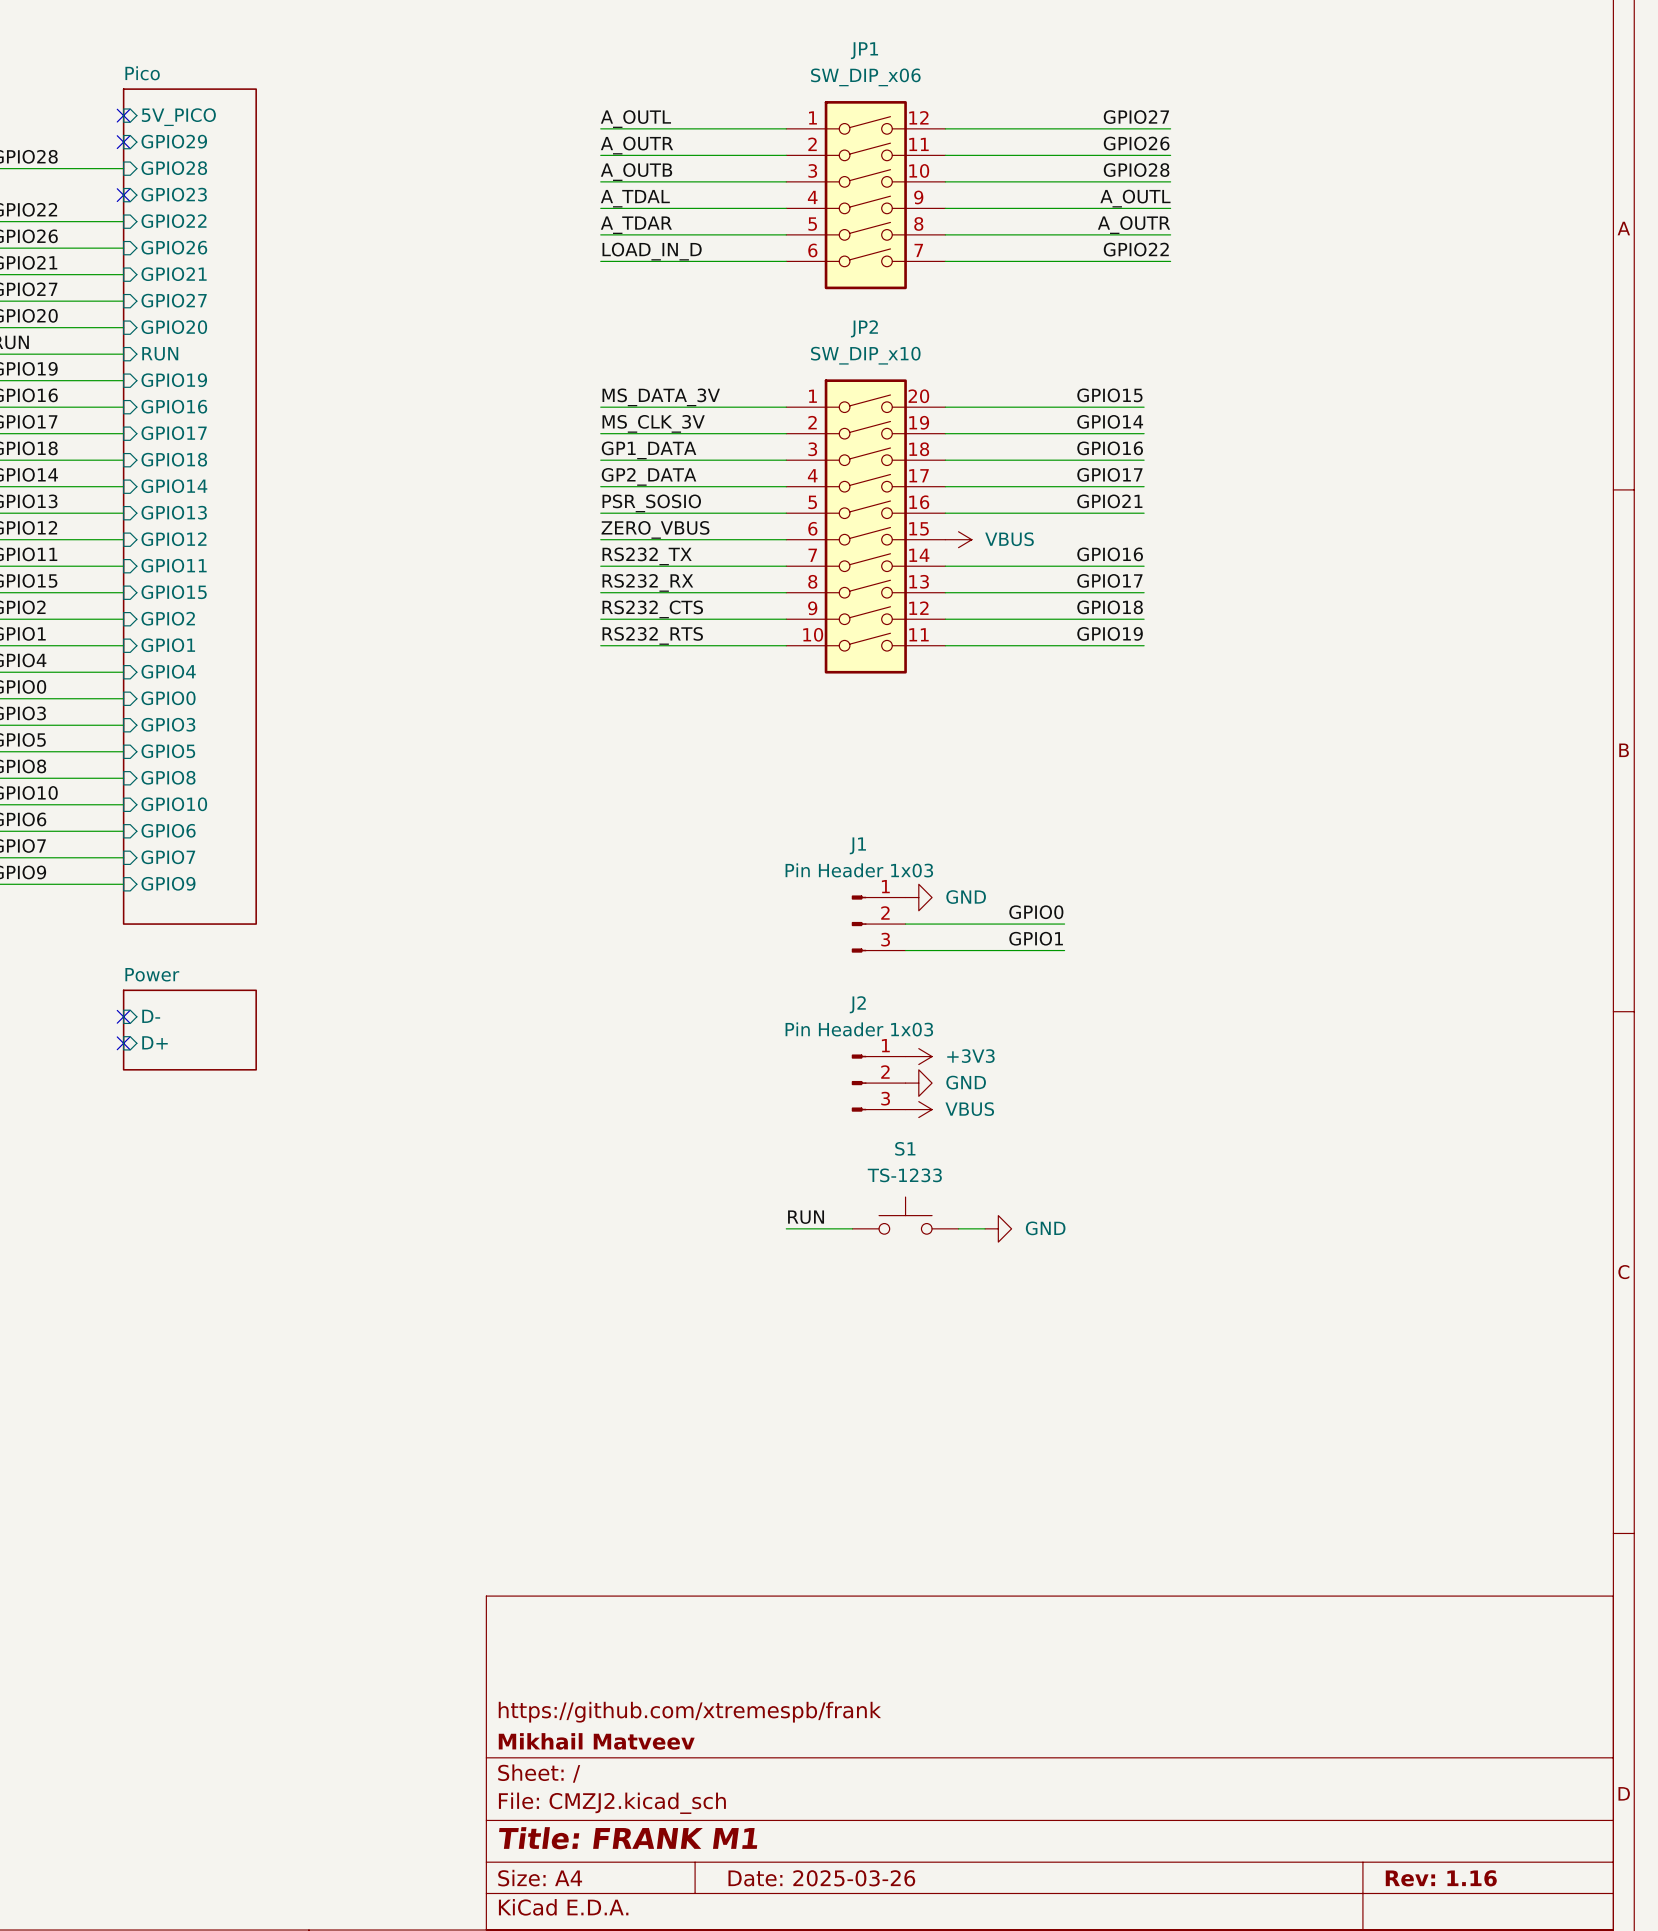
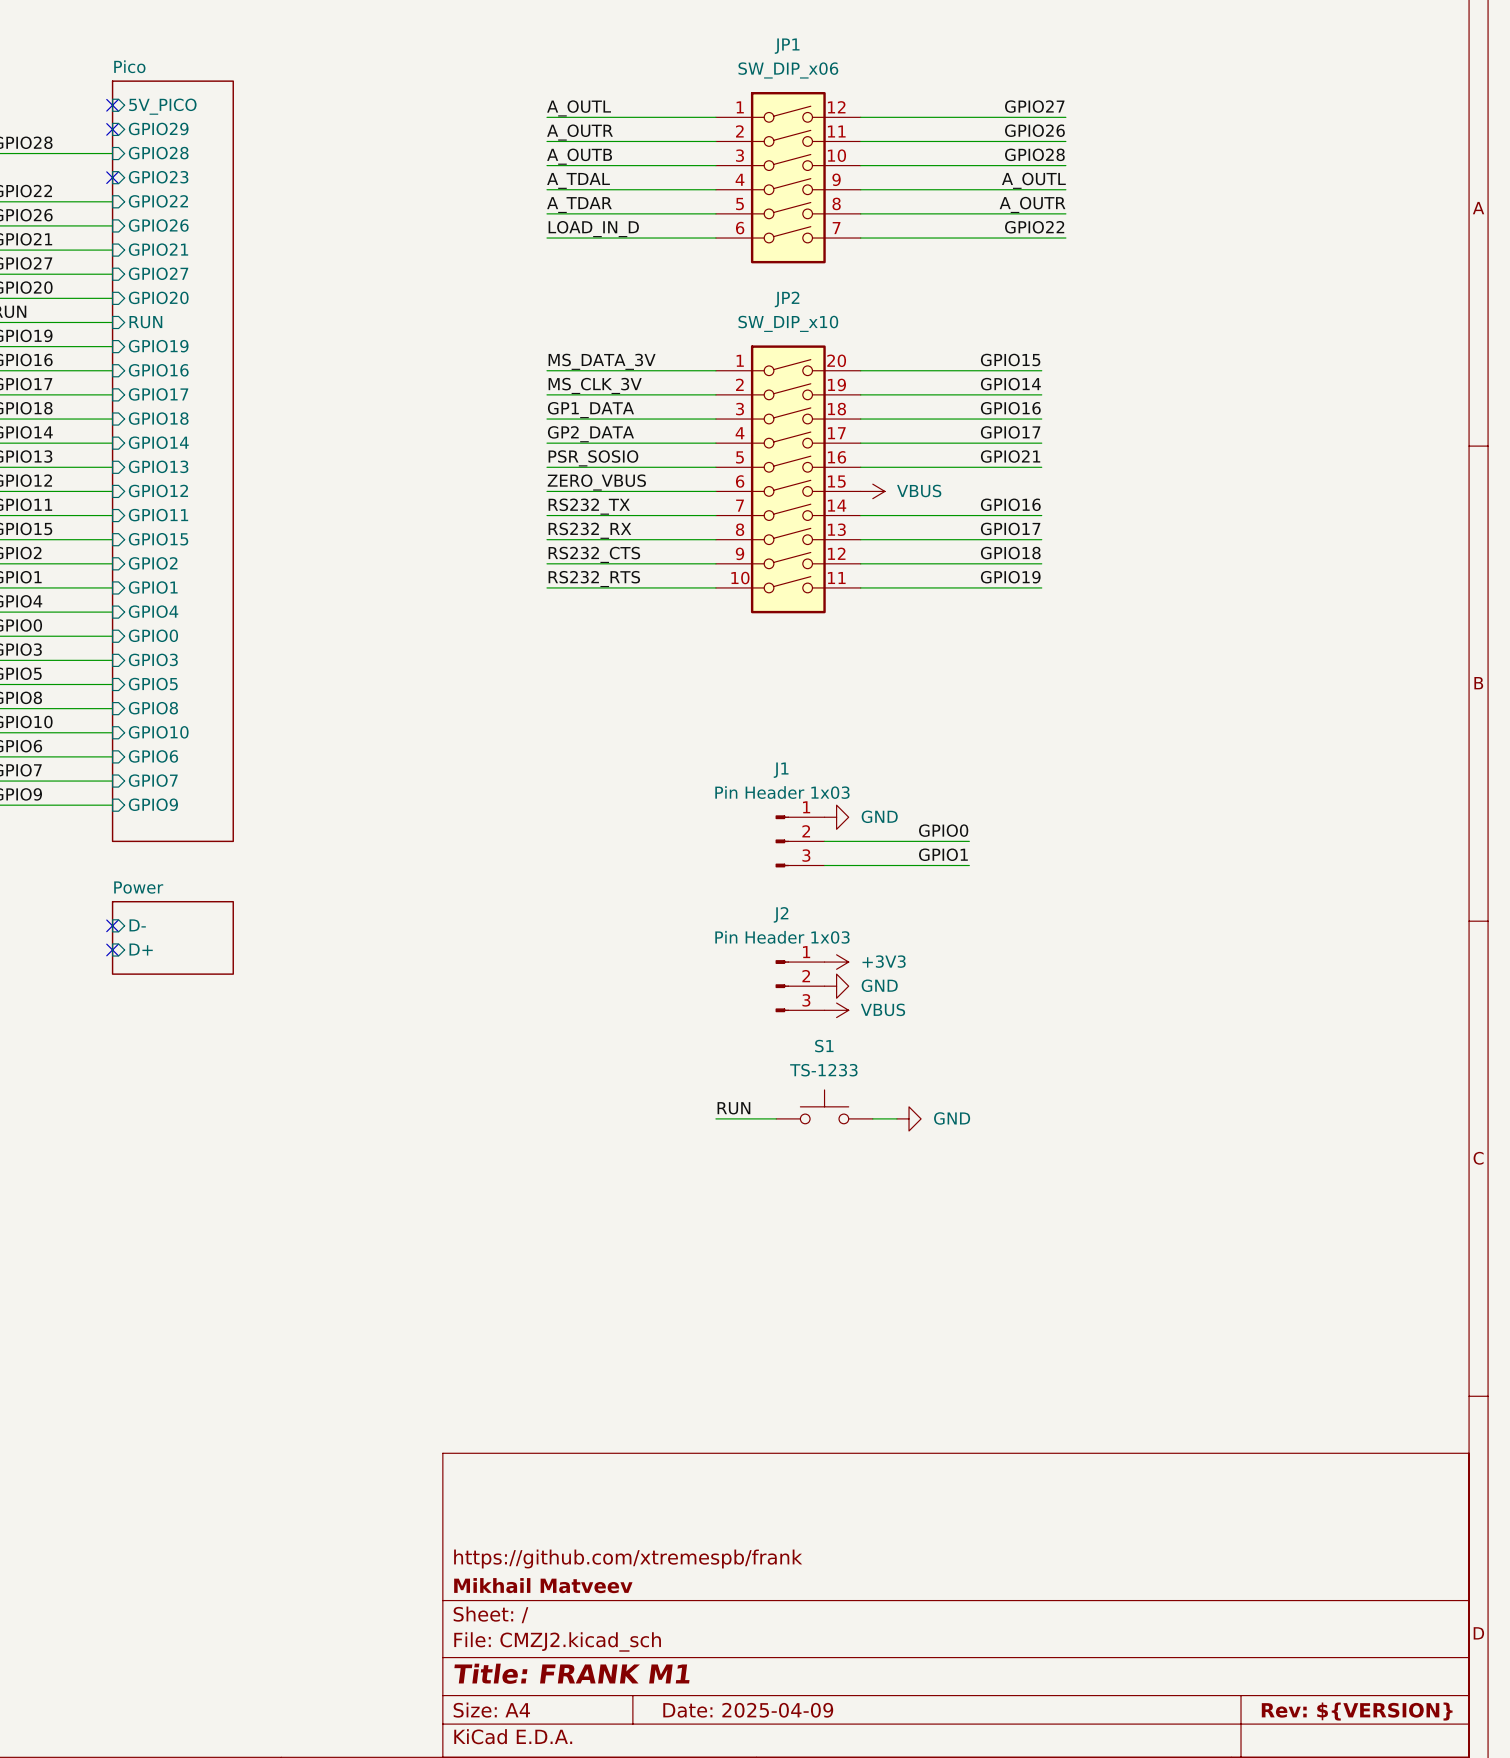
title block: Date: 2025-03-26 (821, 1878) -> Date: 2025-04-09 (748, 1710)
title block: Rev: 1.16 (1441, 1878) -> Rev: ${VERSION} (1357, 1711)

